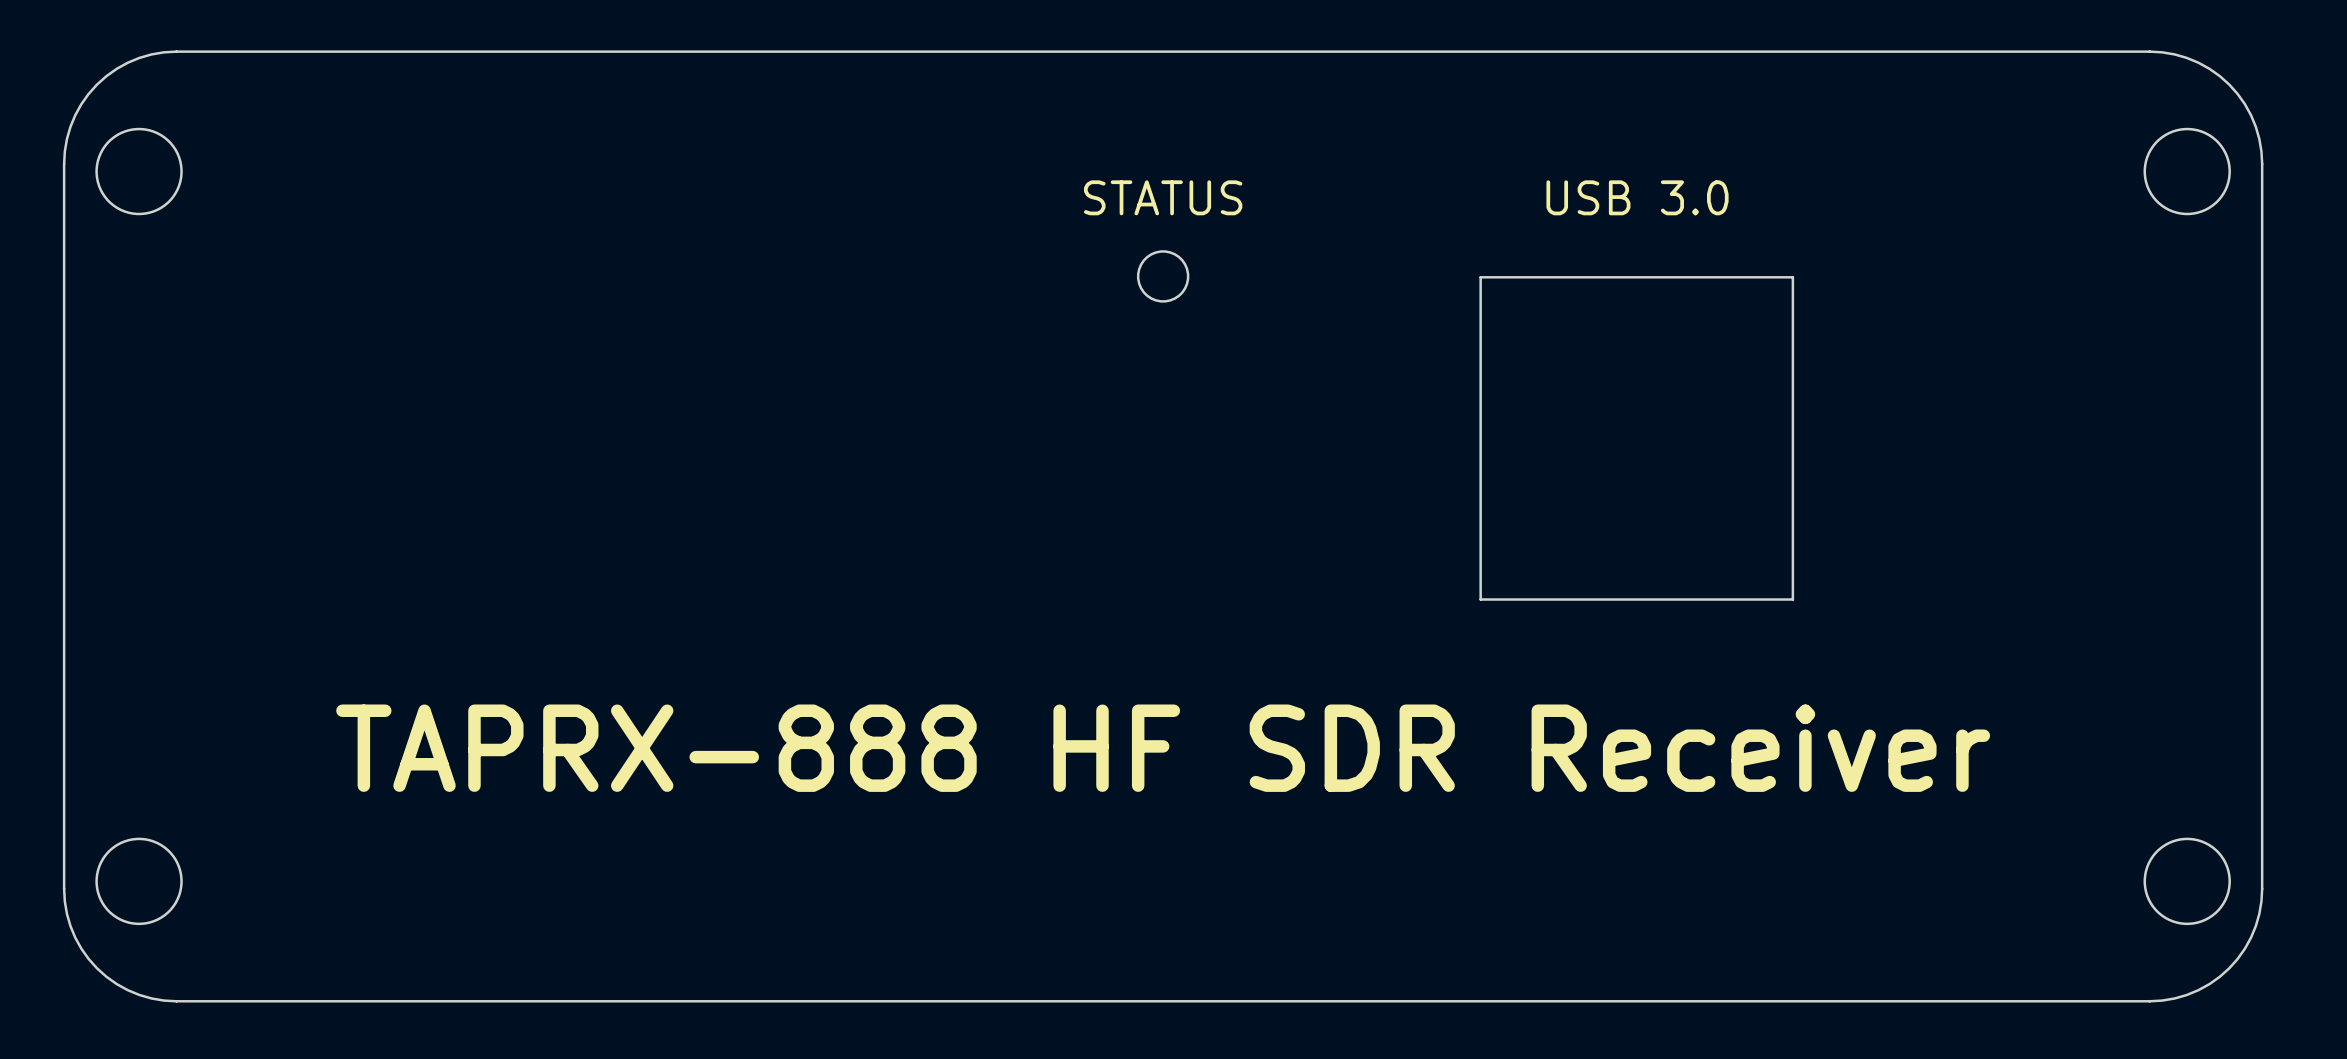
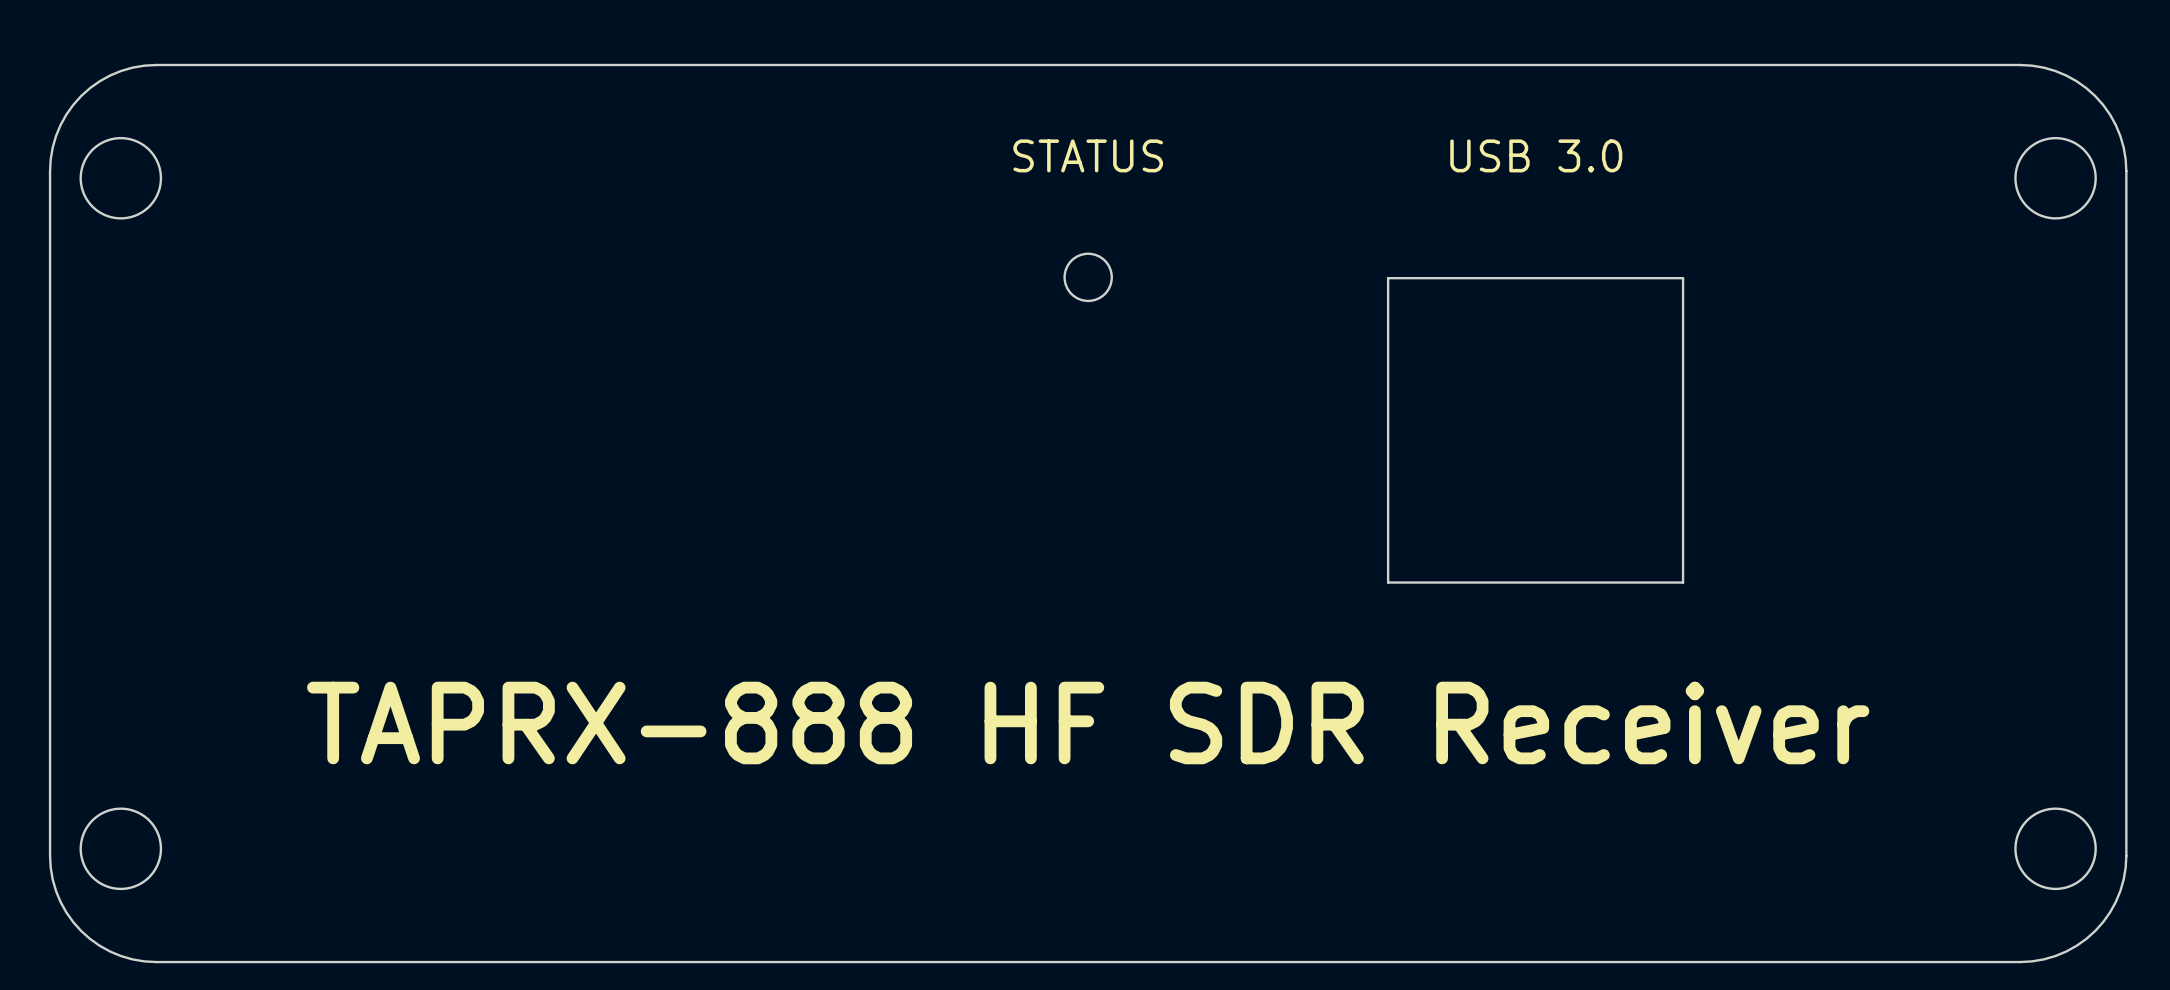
text position: STATUS (1163, 197) -> STATUS (1088, 155)
text position: USB 3.0 (1637, 197) -> USB 3.0 (1536, 155)

